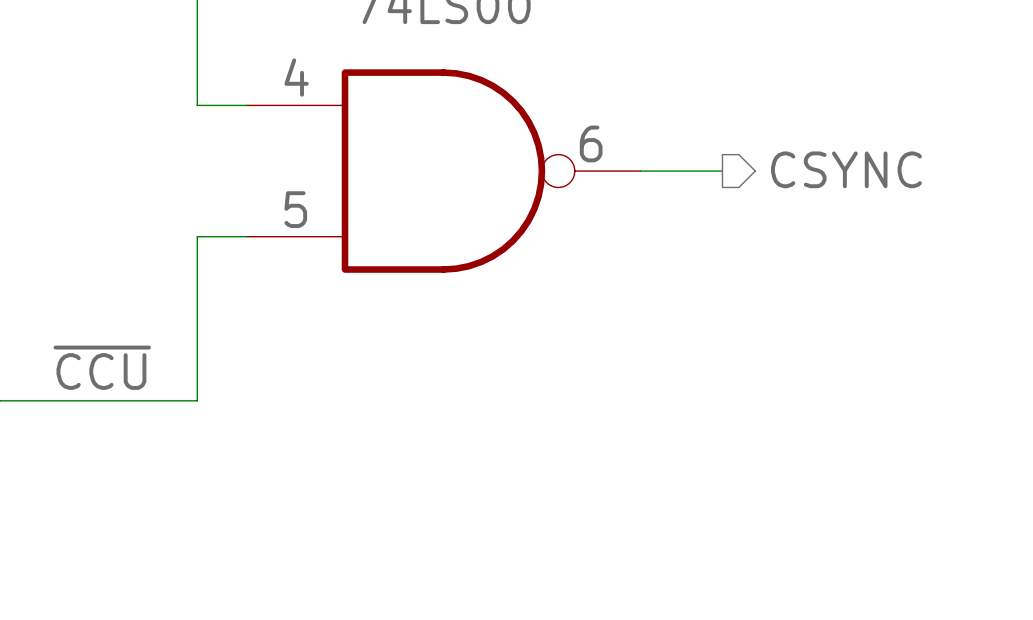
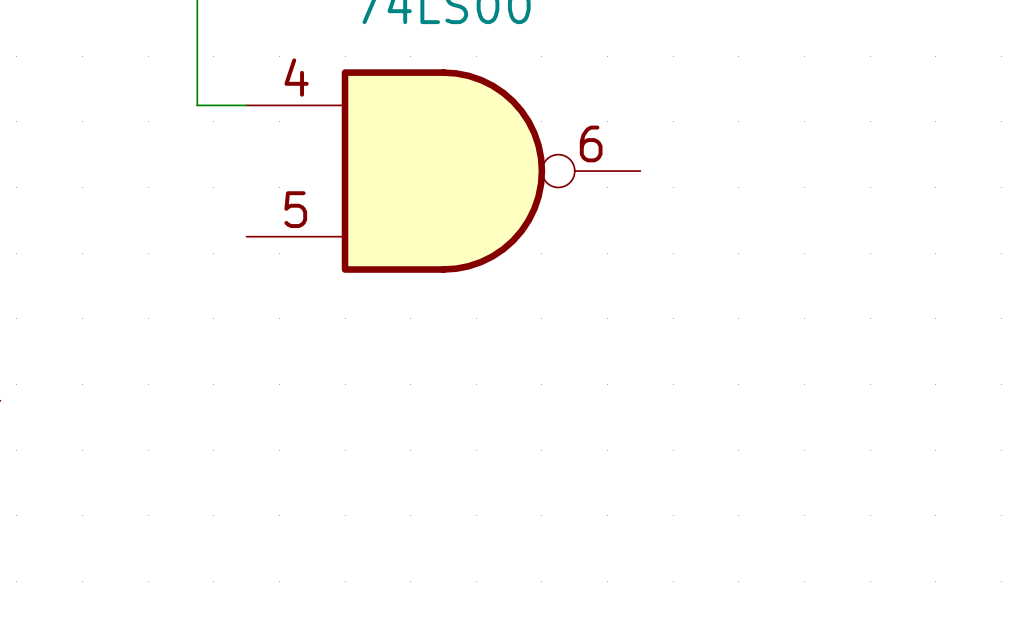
hierarchical label: CSYNC (846, 169) -> none
wire: (640, 171) (722, 171) -> none
wire: (246, 236) (197, 236) (197, 400) (0, 400) -> none
label: ~{CCU} (102, 367) -> none

